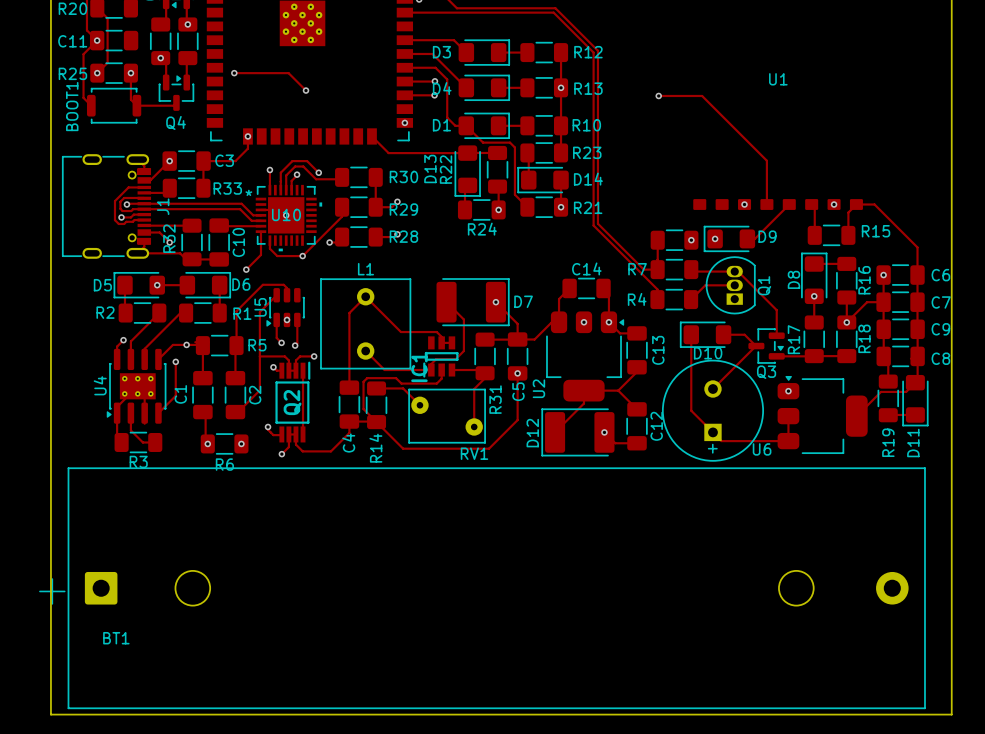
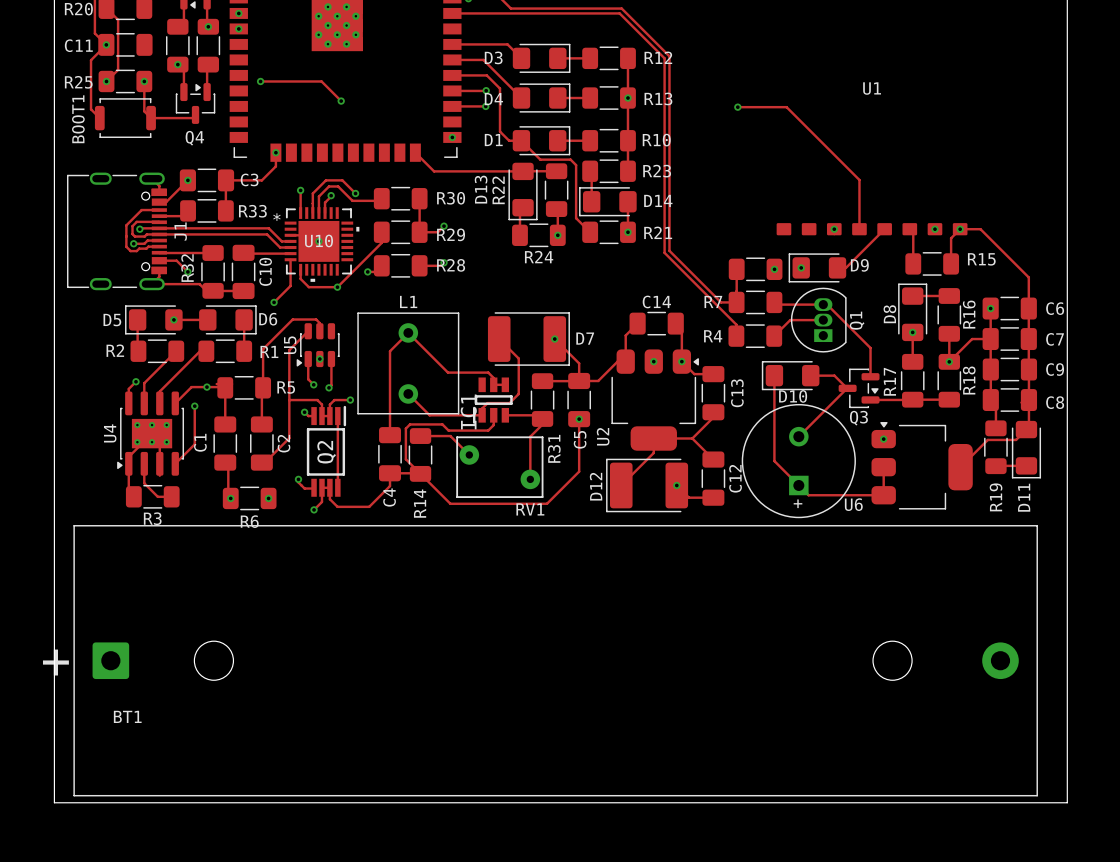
via: none -> (238, 13)
via: none -> (238, 28)
via: none -> (960, 229)

